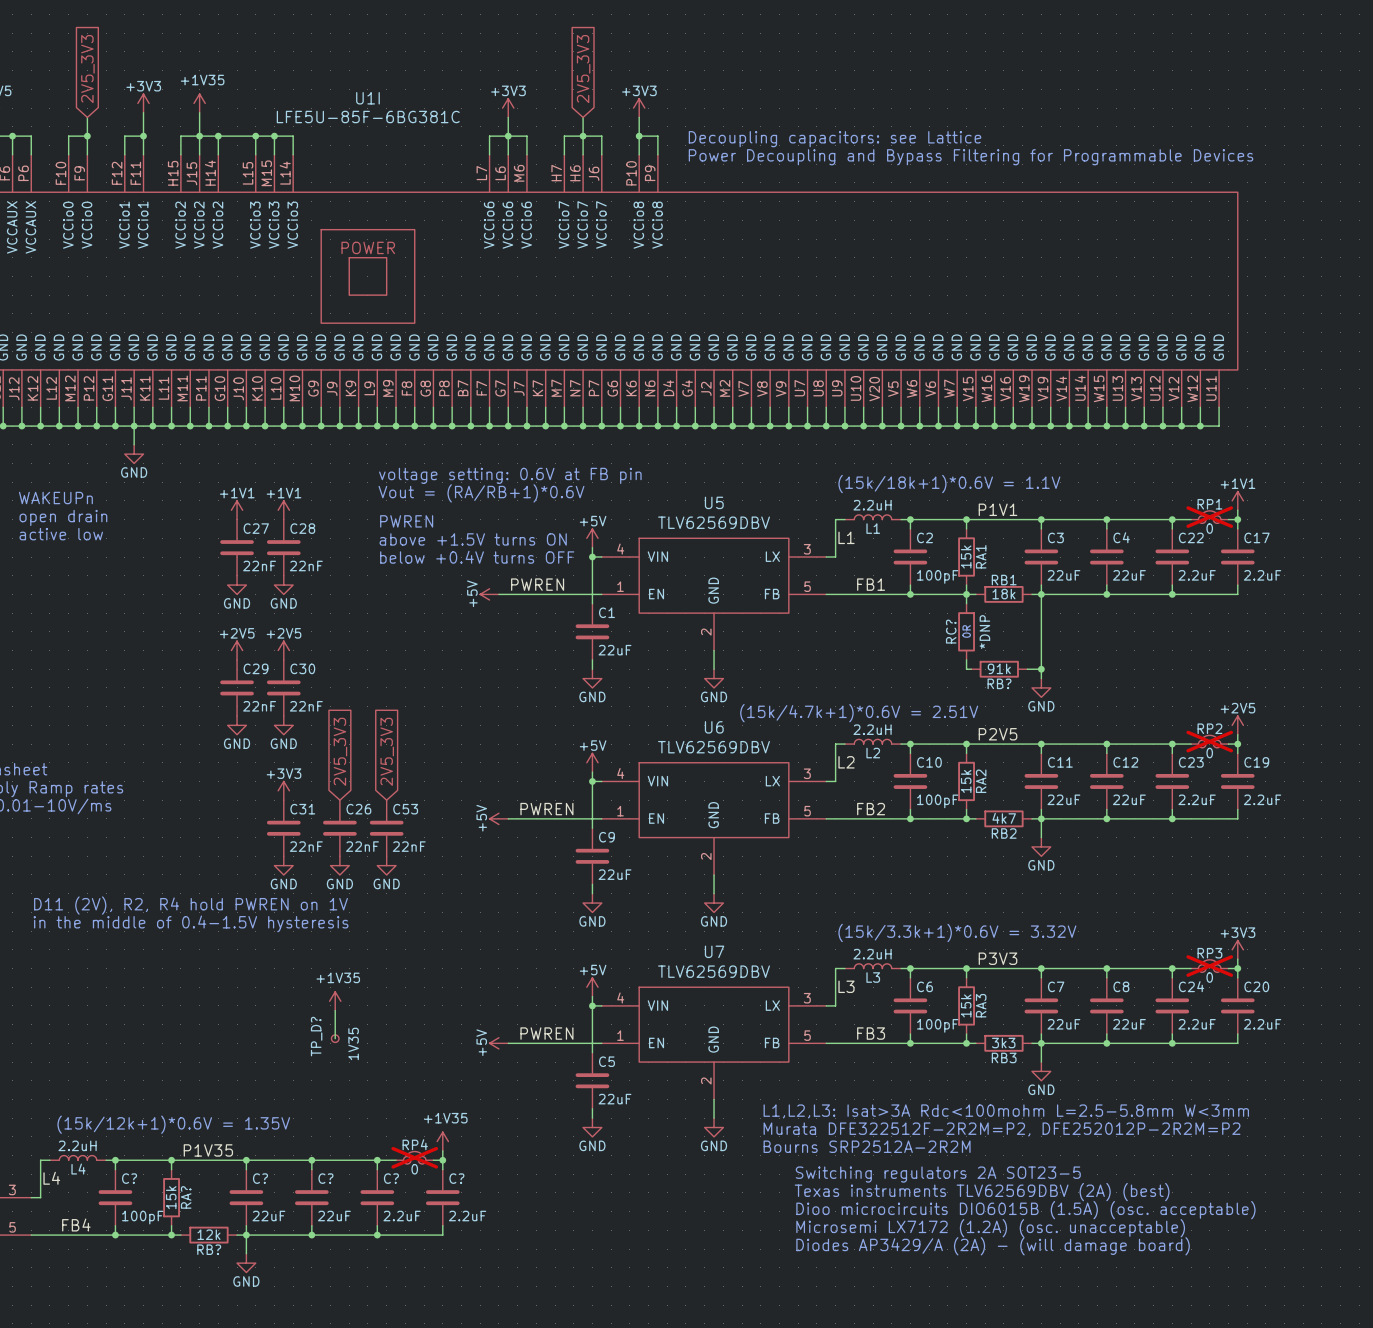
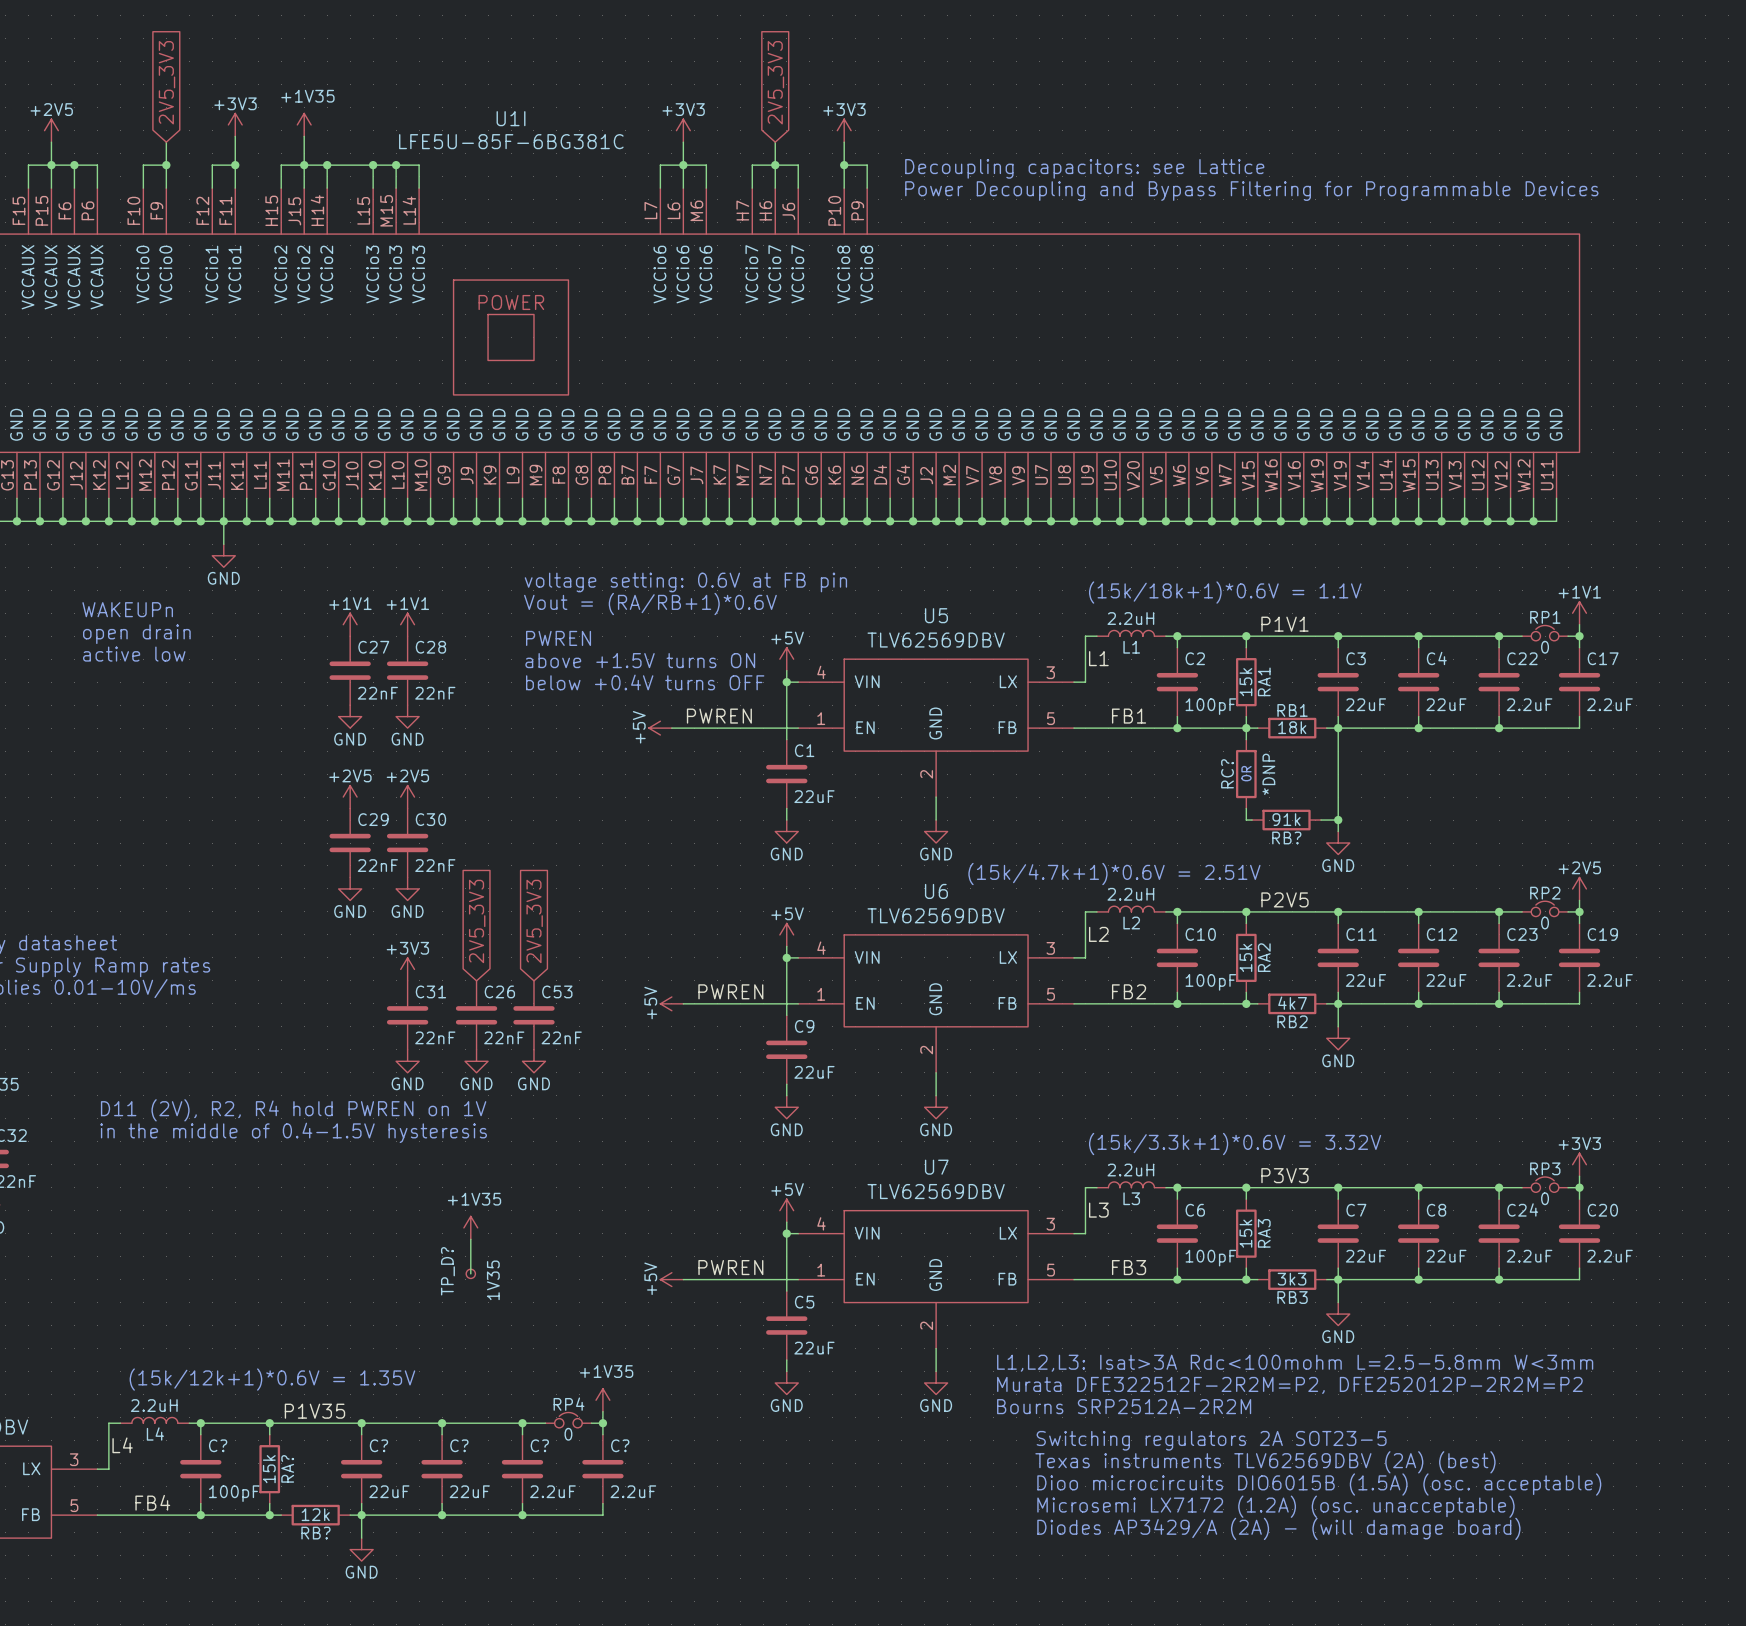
RP1 do-not-place cross: (1209, 517) -> none
RP2 do-not-place cross: (1209, 741) -> none
RP3 do-not-place cross: (1209, 966) -> none
RP4 do-not-place cross: (414, 1157) -> none

